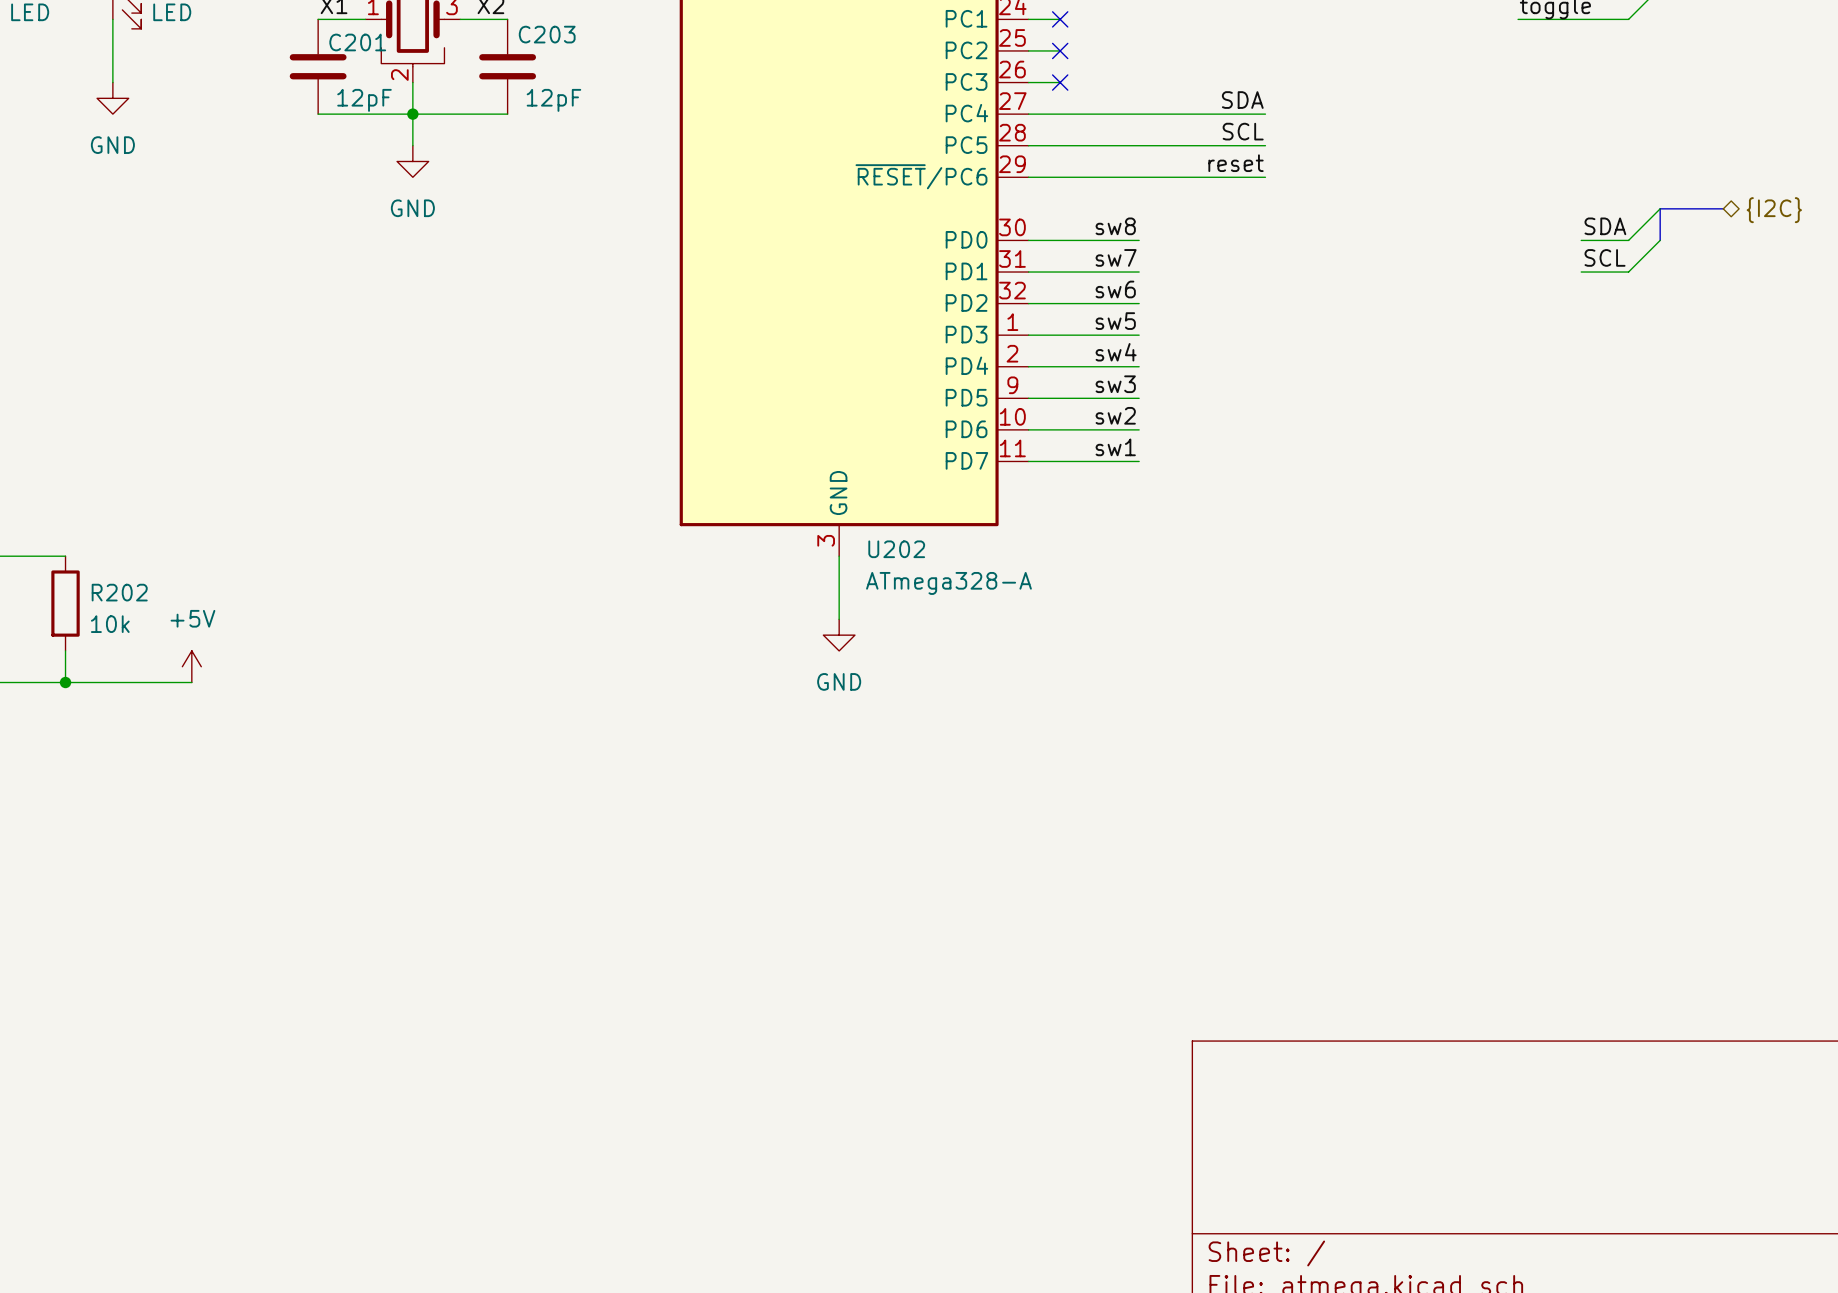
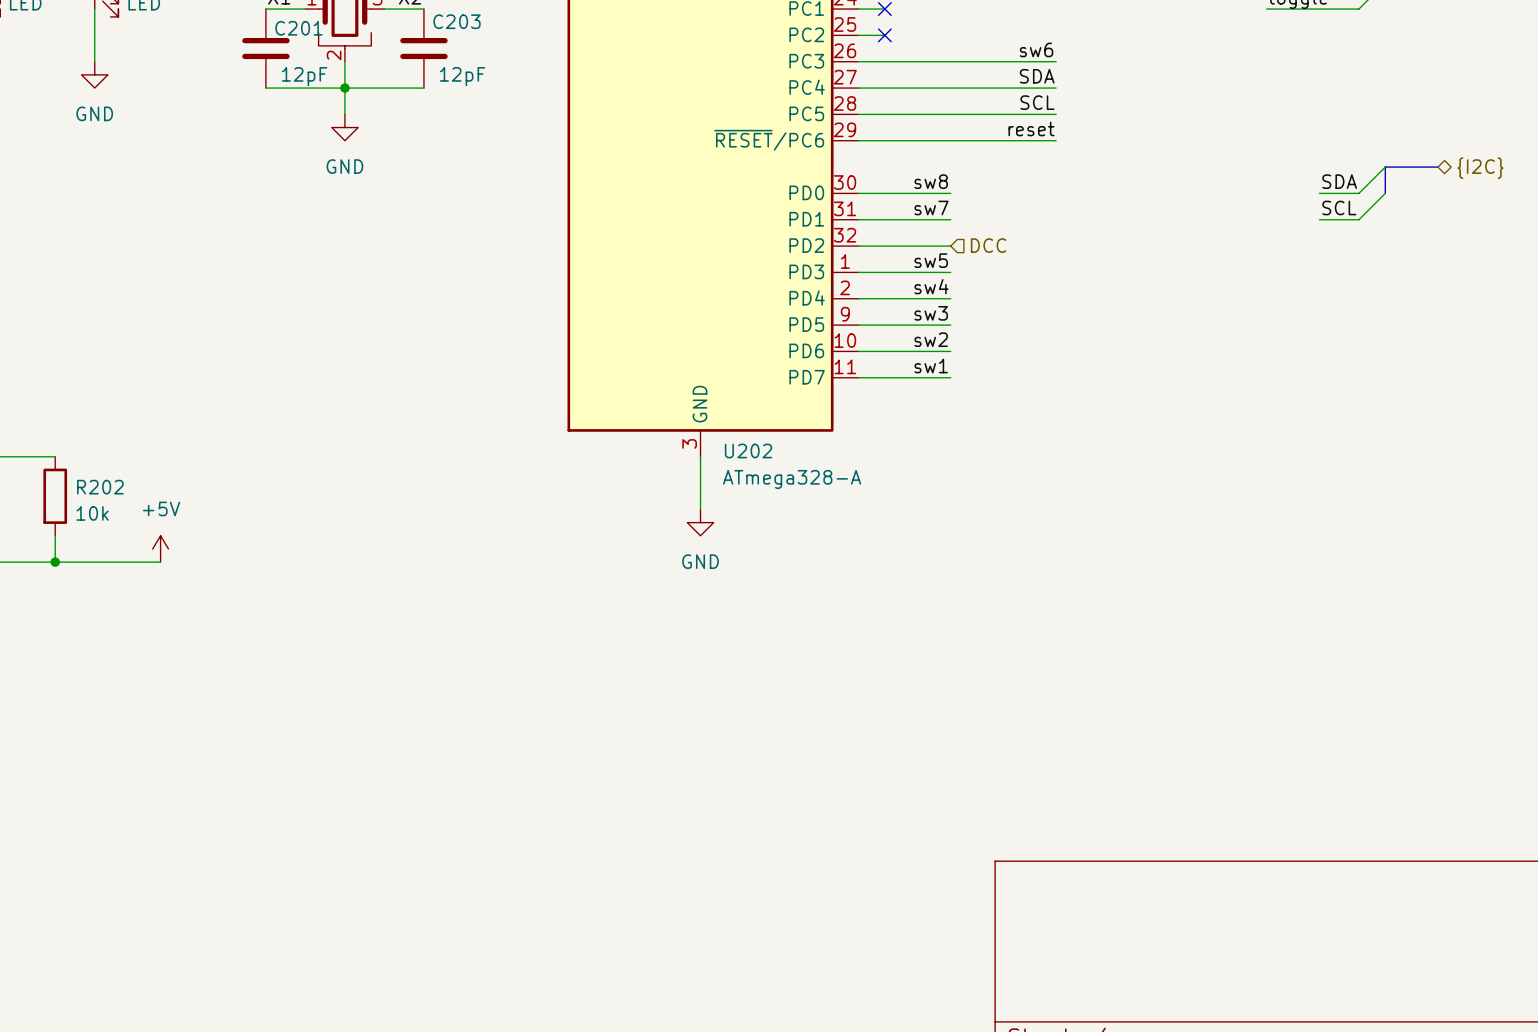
wire: none -> (884, 61) (1056, 61)
no-connect mark: (1060, 82) -> none
label position: sw6 (1115, 289) -> sw6 (1036, 49)
hierarchical label: none -> DCC (988, 245)

